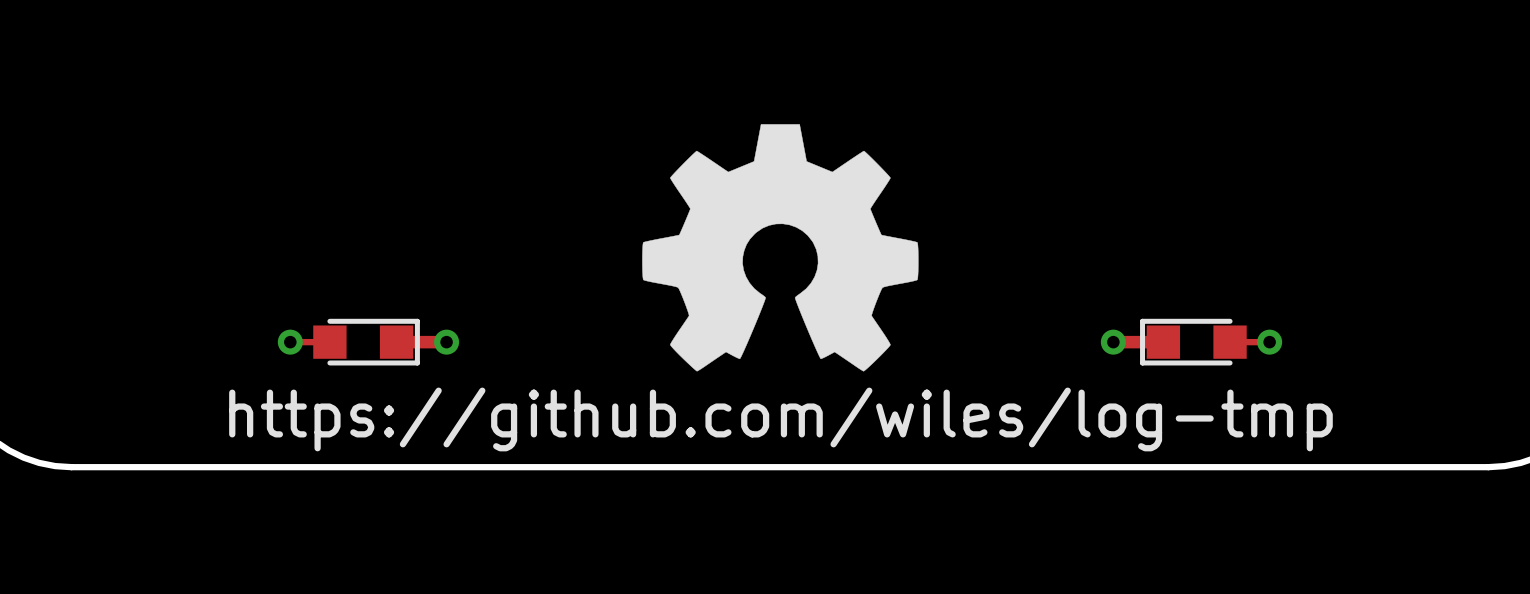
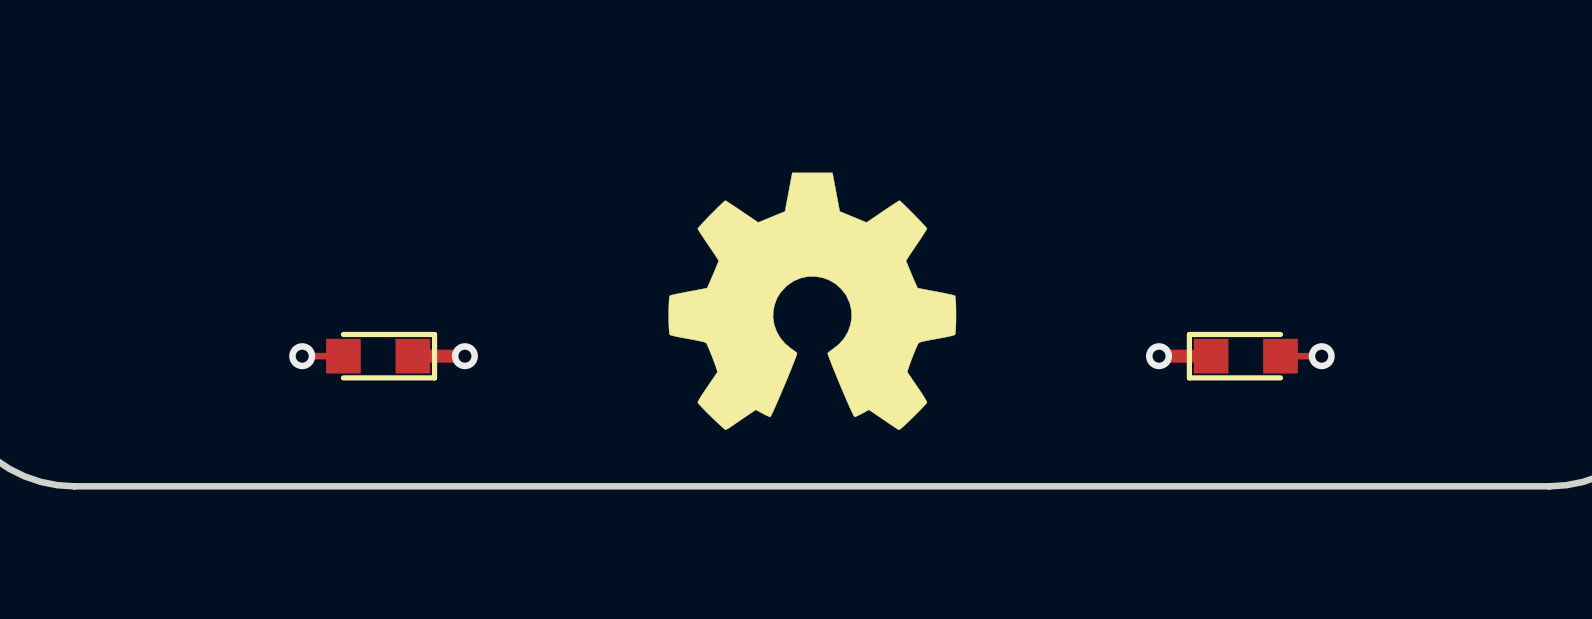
drawing position: (780, 247) -> (812, 301)
text: https://github.com/wiles/log-tmp (780, 419) -> none

